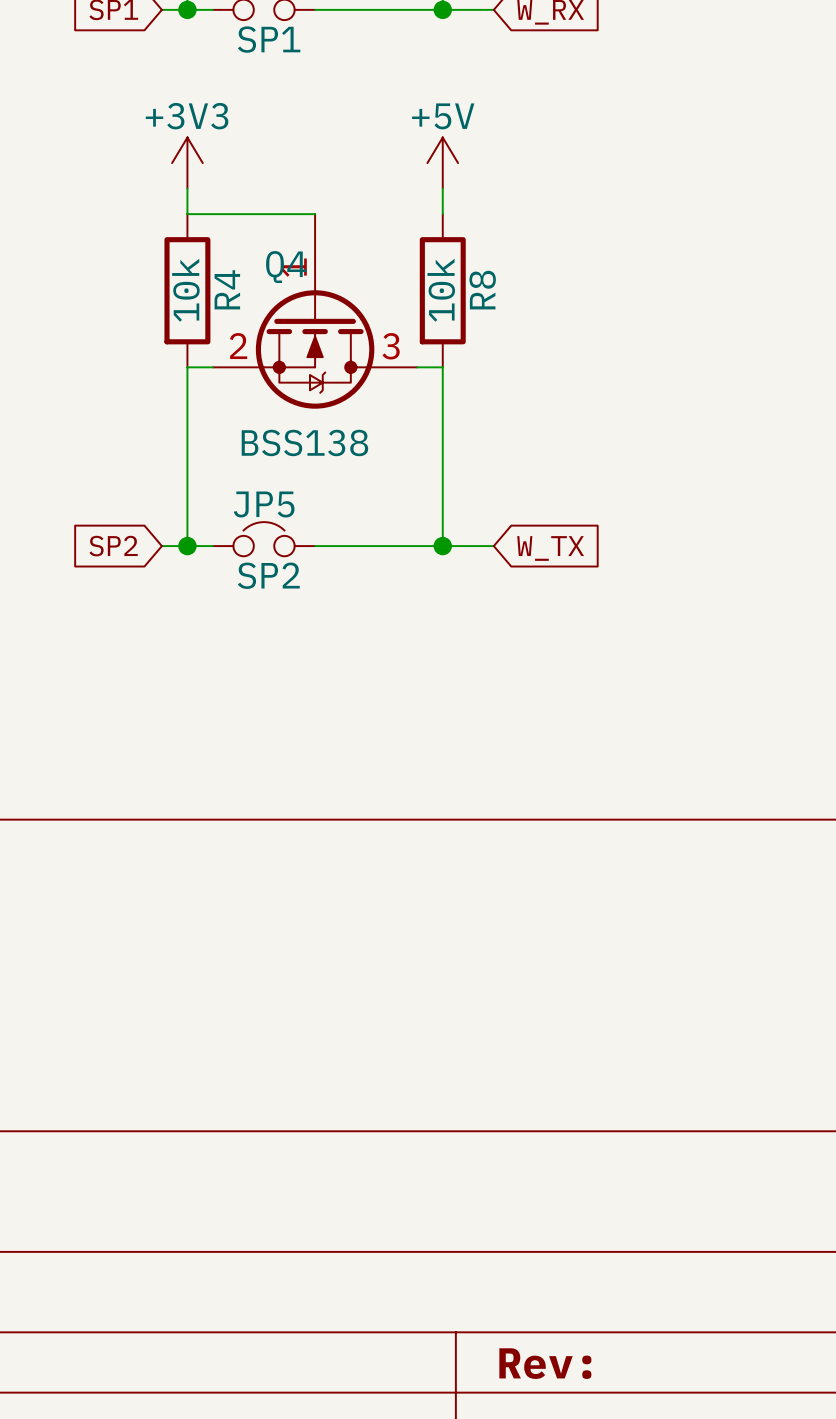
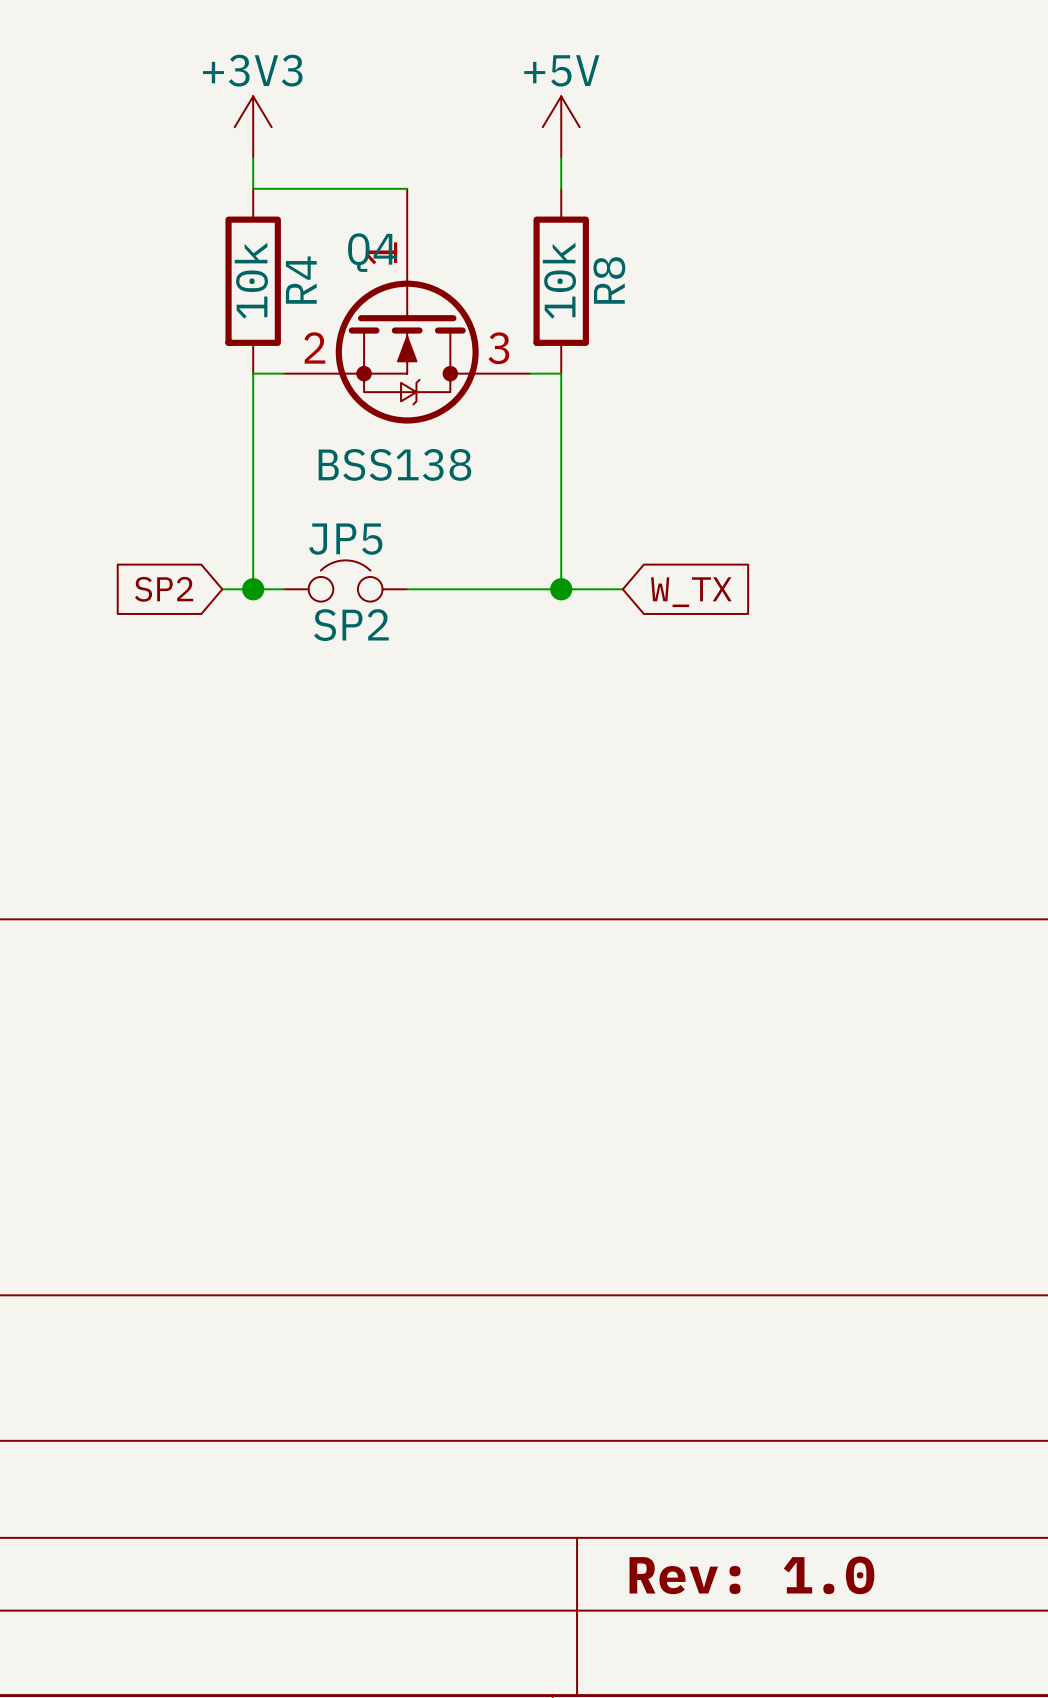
title block: Rev: (545, 1363) -> Rev: 1.0 (751, 1575)

